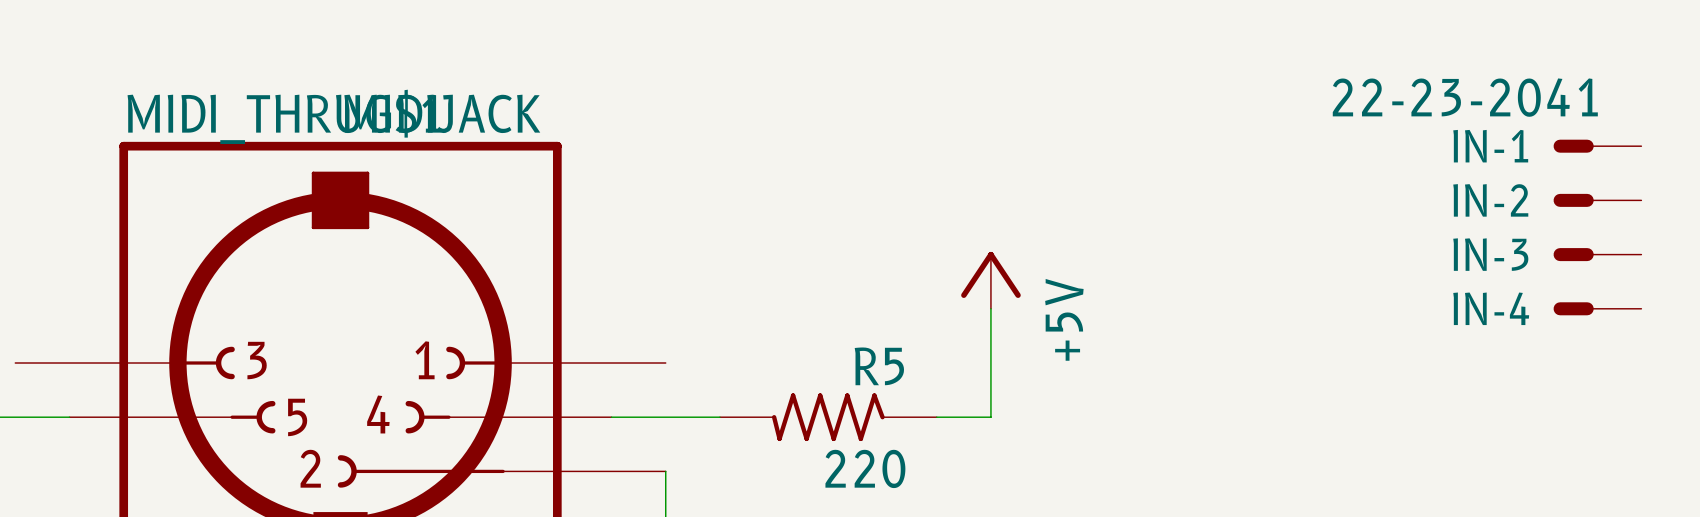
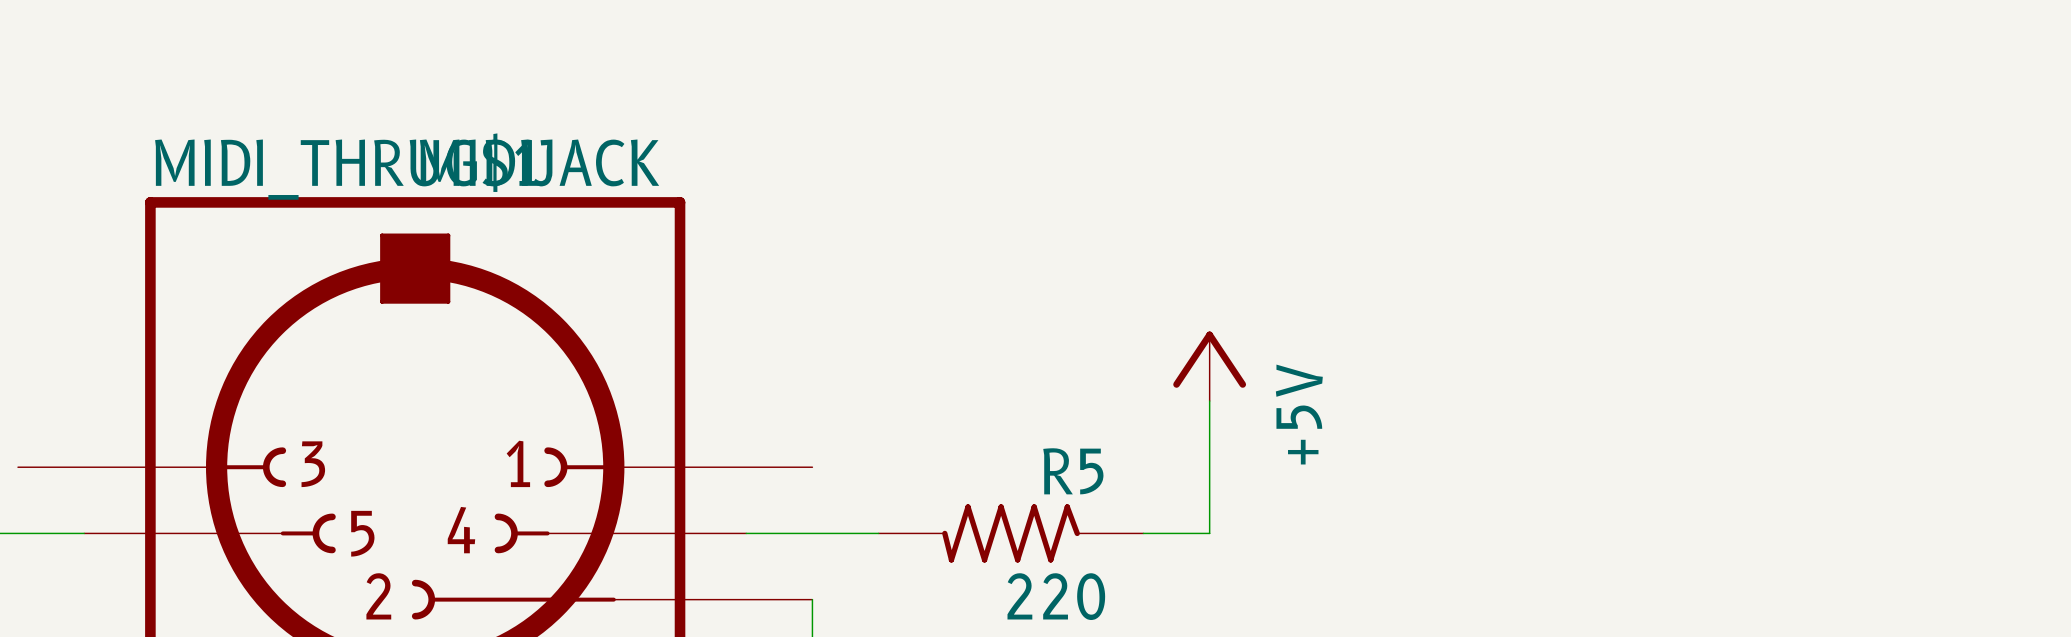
IN-1: 22-23-2041 (1597, 146) -> none
IN-2: (1597, 200) -> none
IN-3: (1597, 254) -> none
IN-4: (1597, 308) -> none

